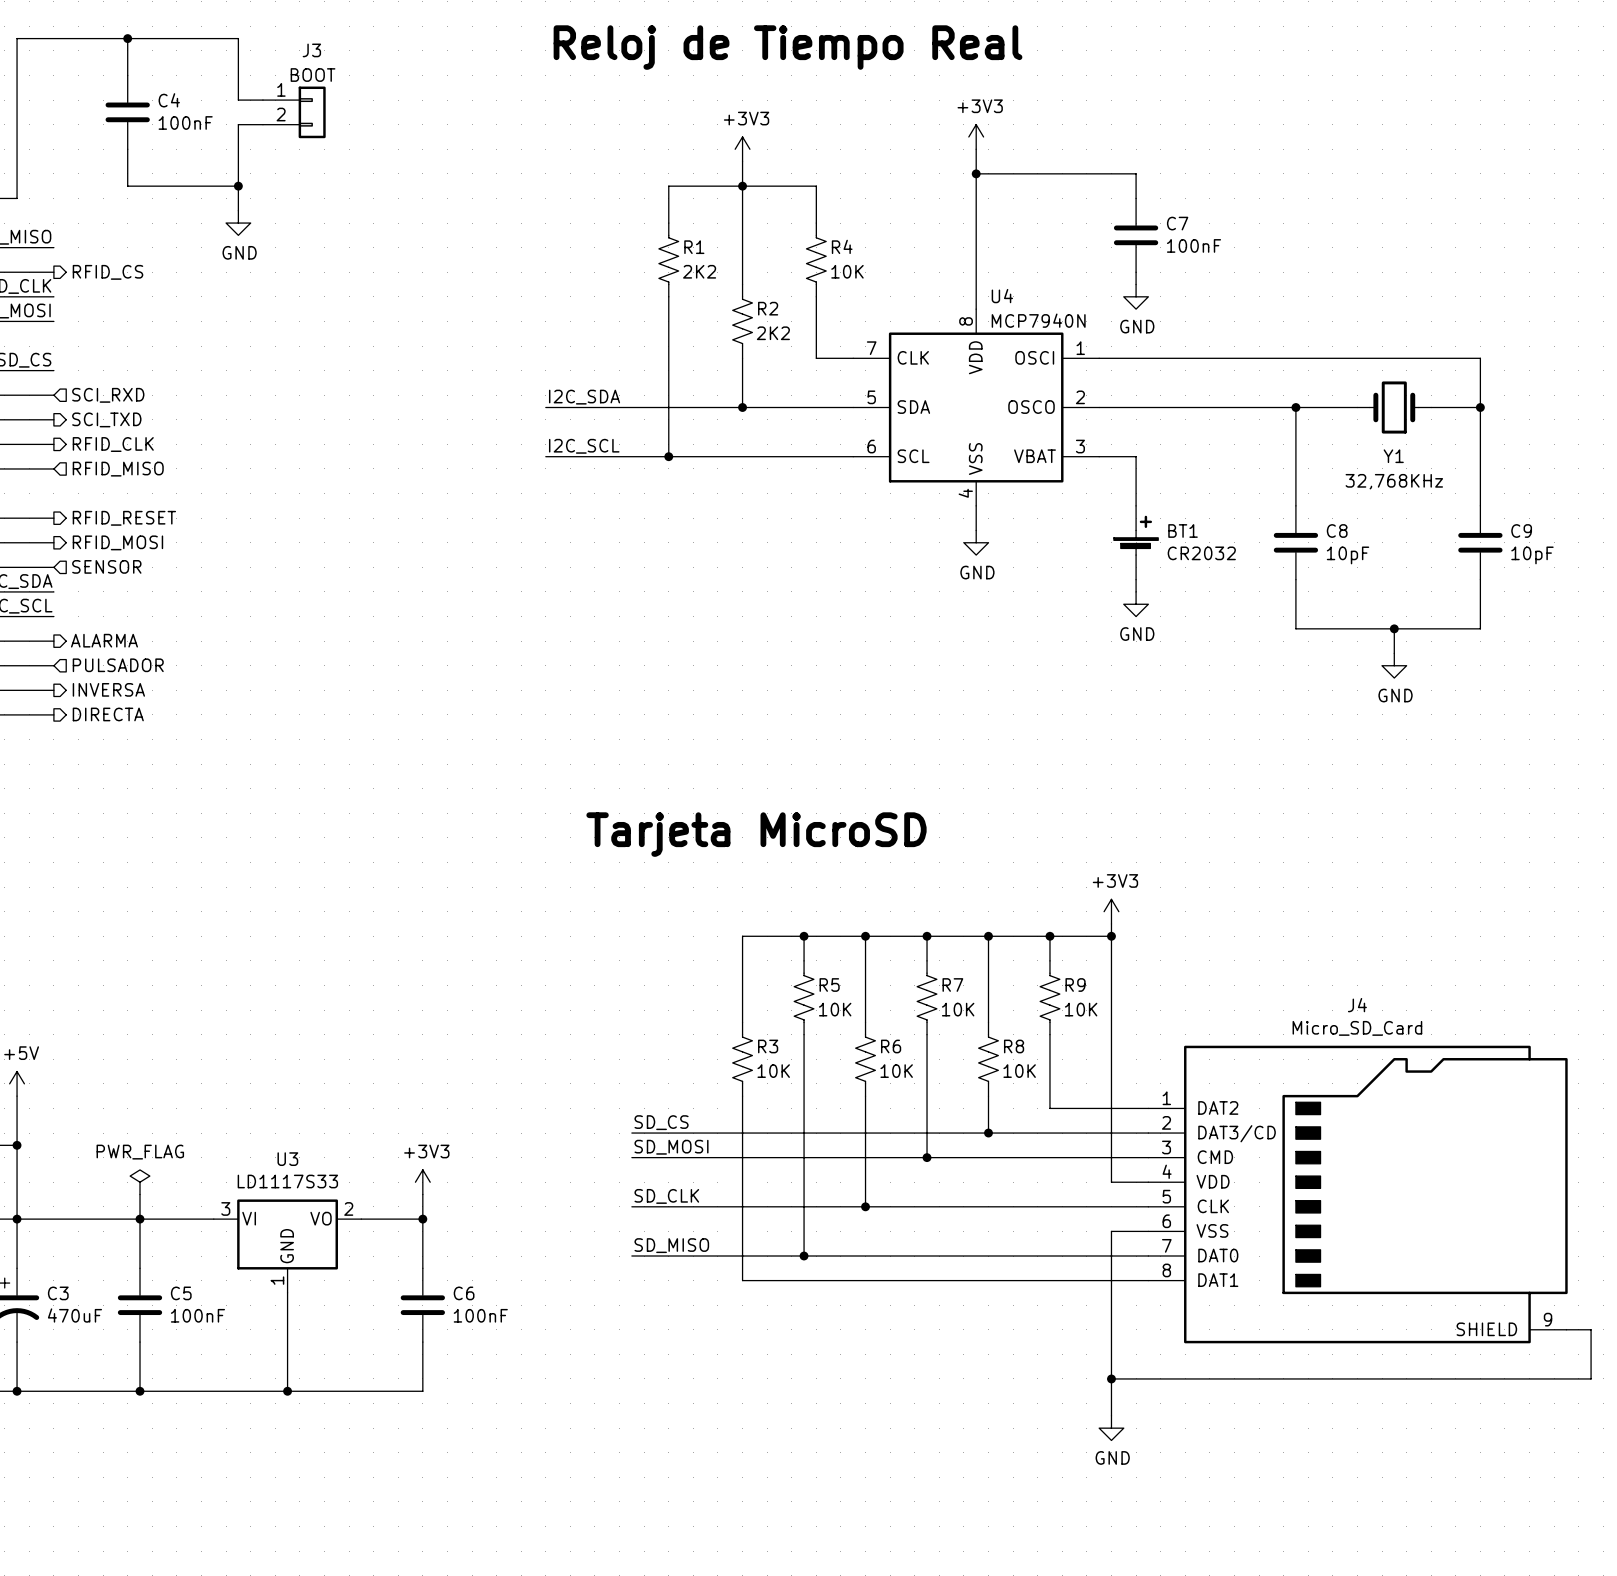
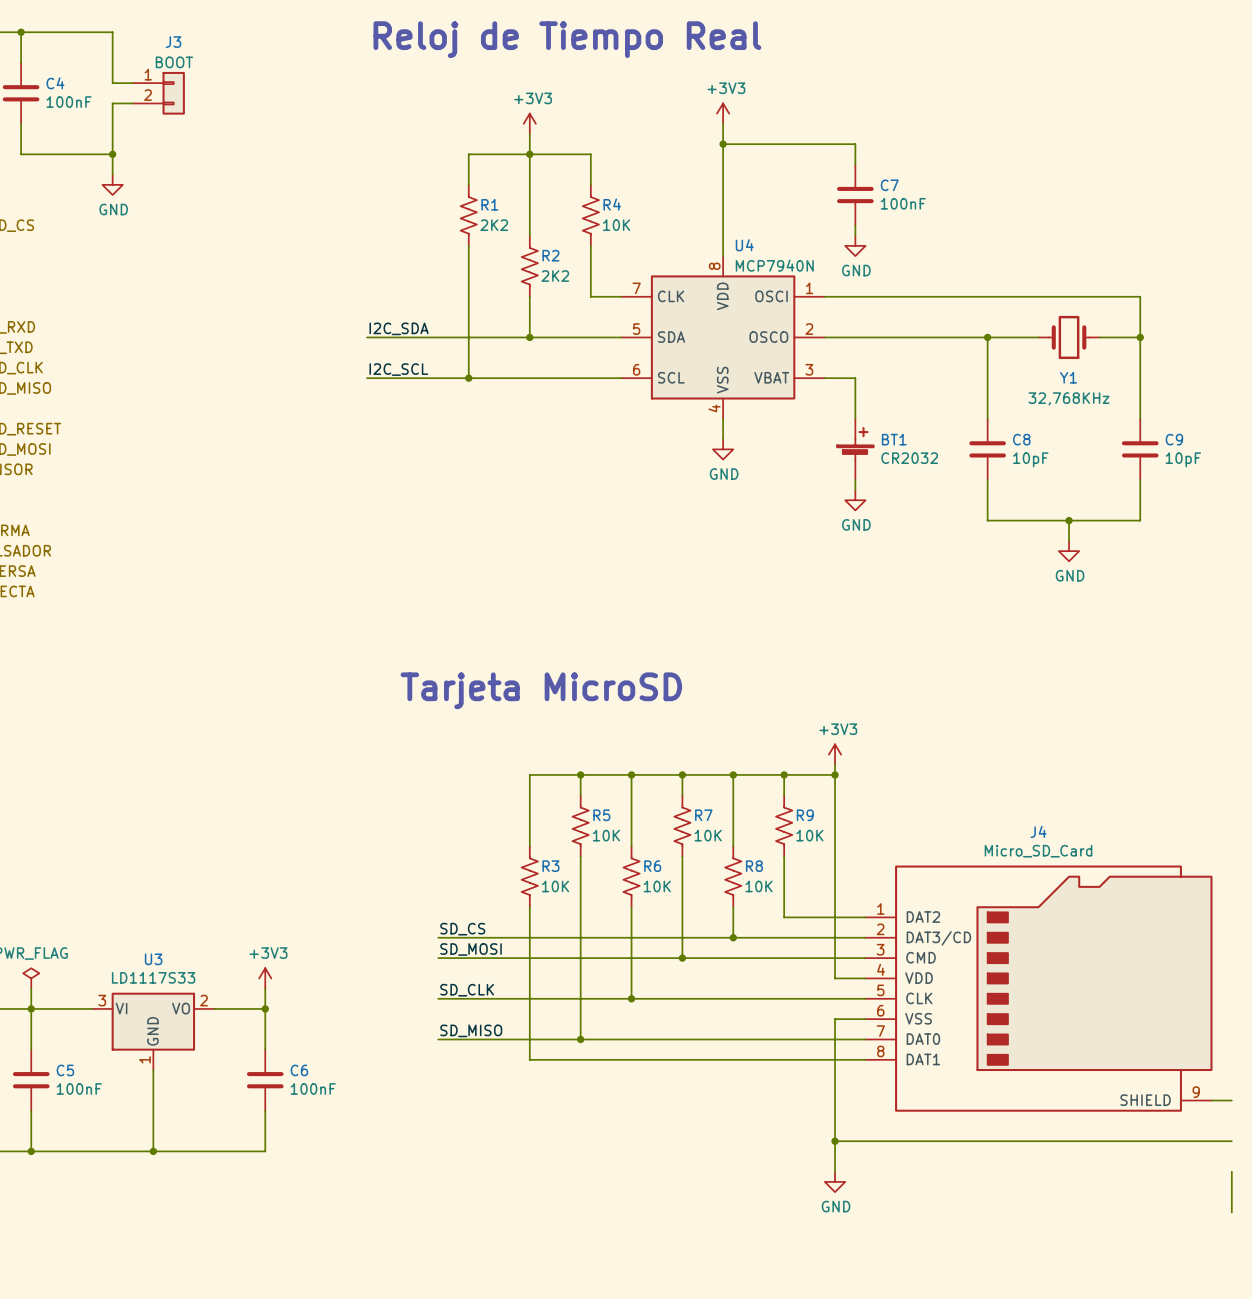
wire: (1591, 1329) (1591, 1378) -> (1231, 1171) (1231, 1212)

